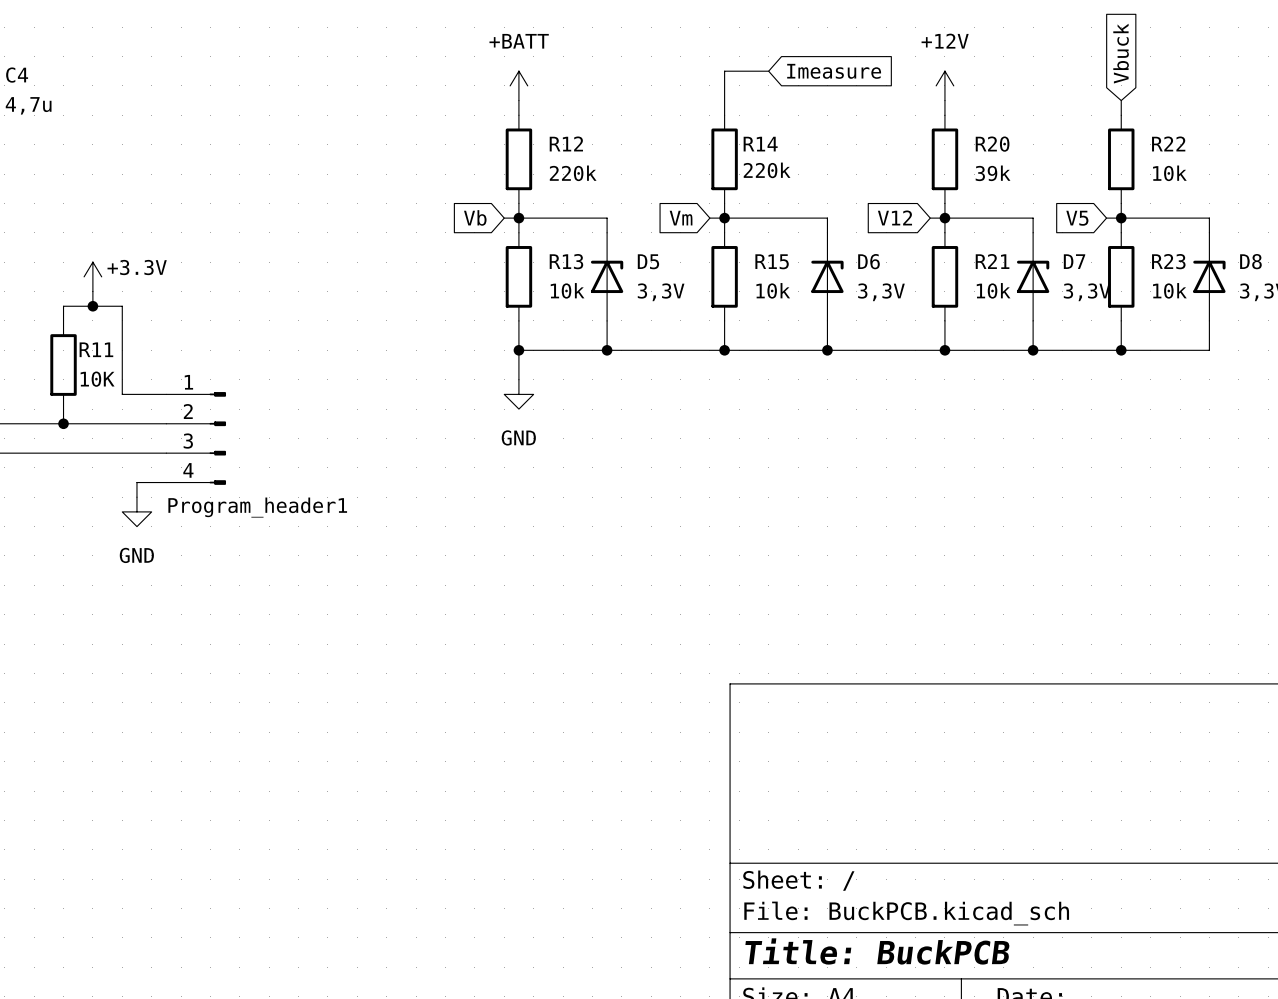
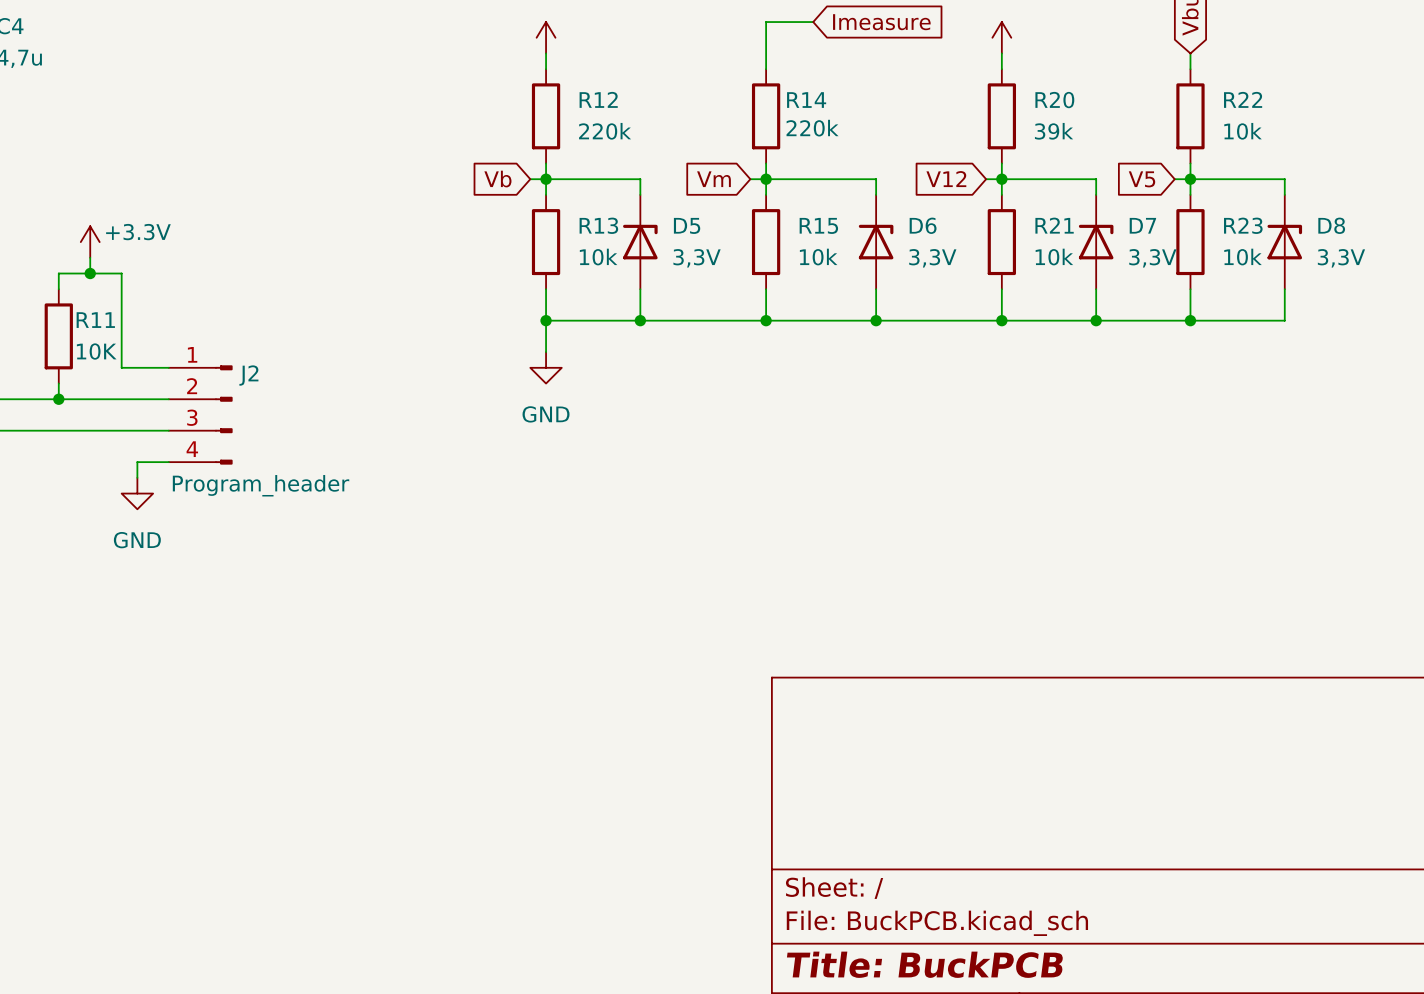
Program_header1 value: none -> Program_header (261, 485)
Program_header1 name: Program_header1 (257, 507) -> J2 (248, 375)

